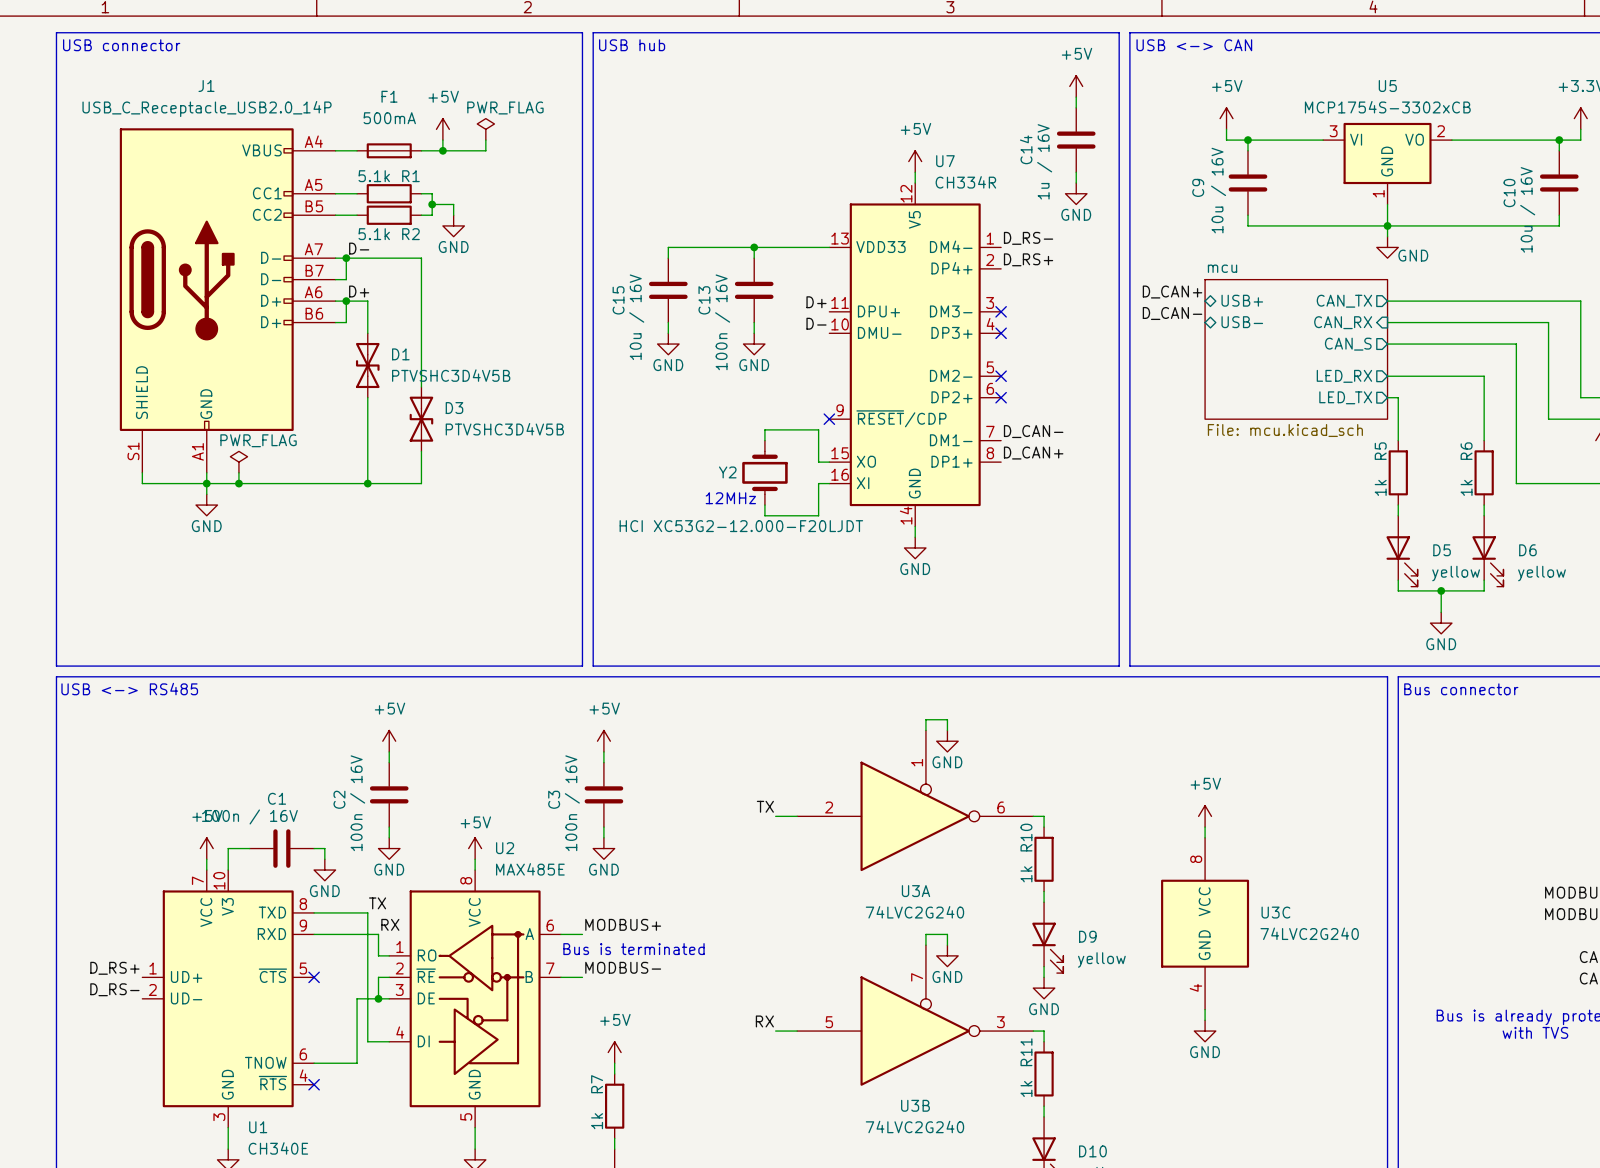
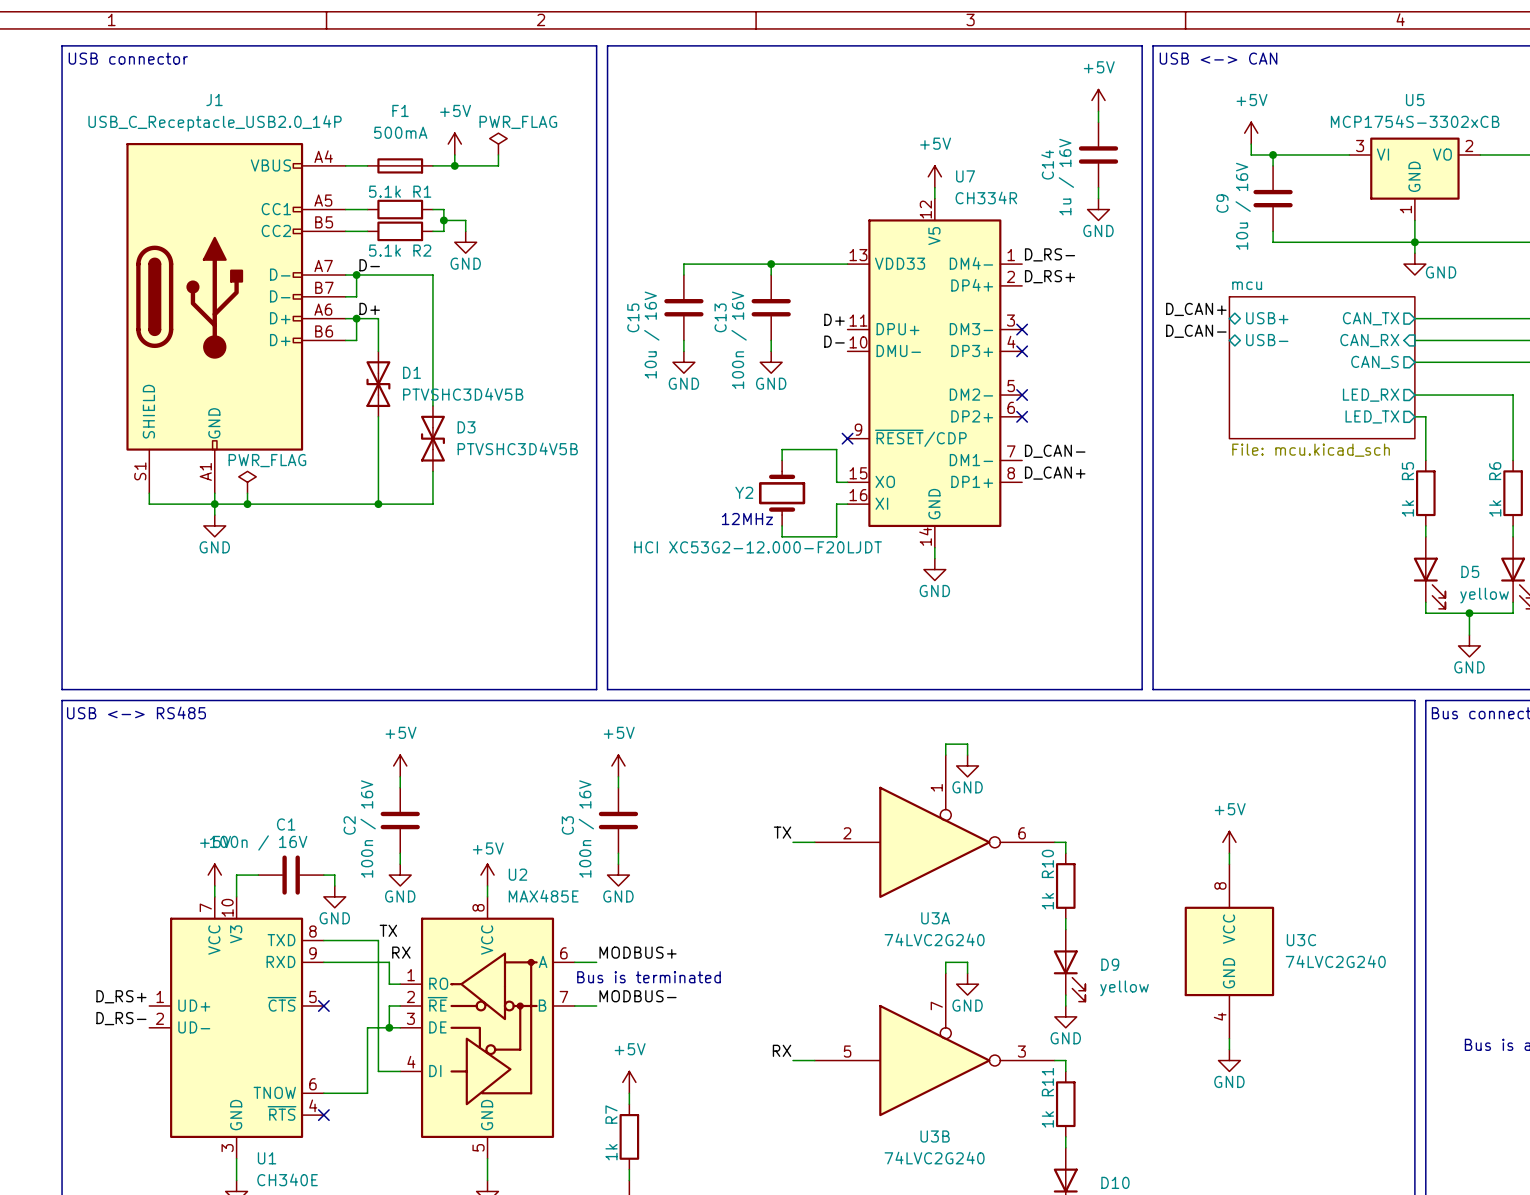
text: USB hub (632, 45) -> none

